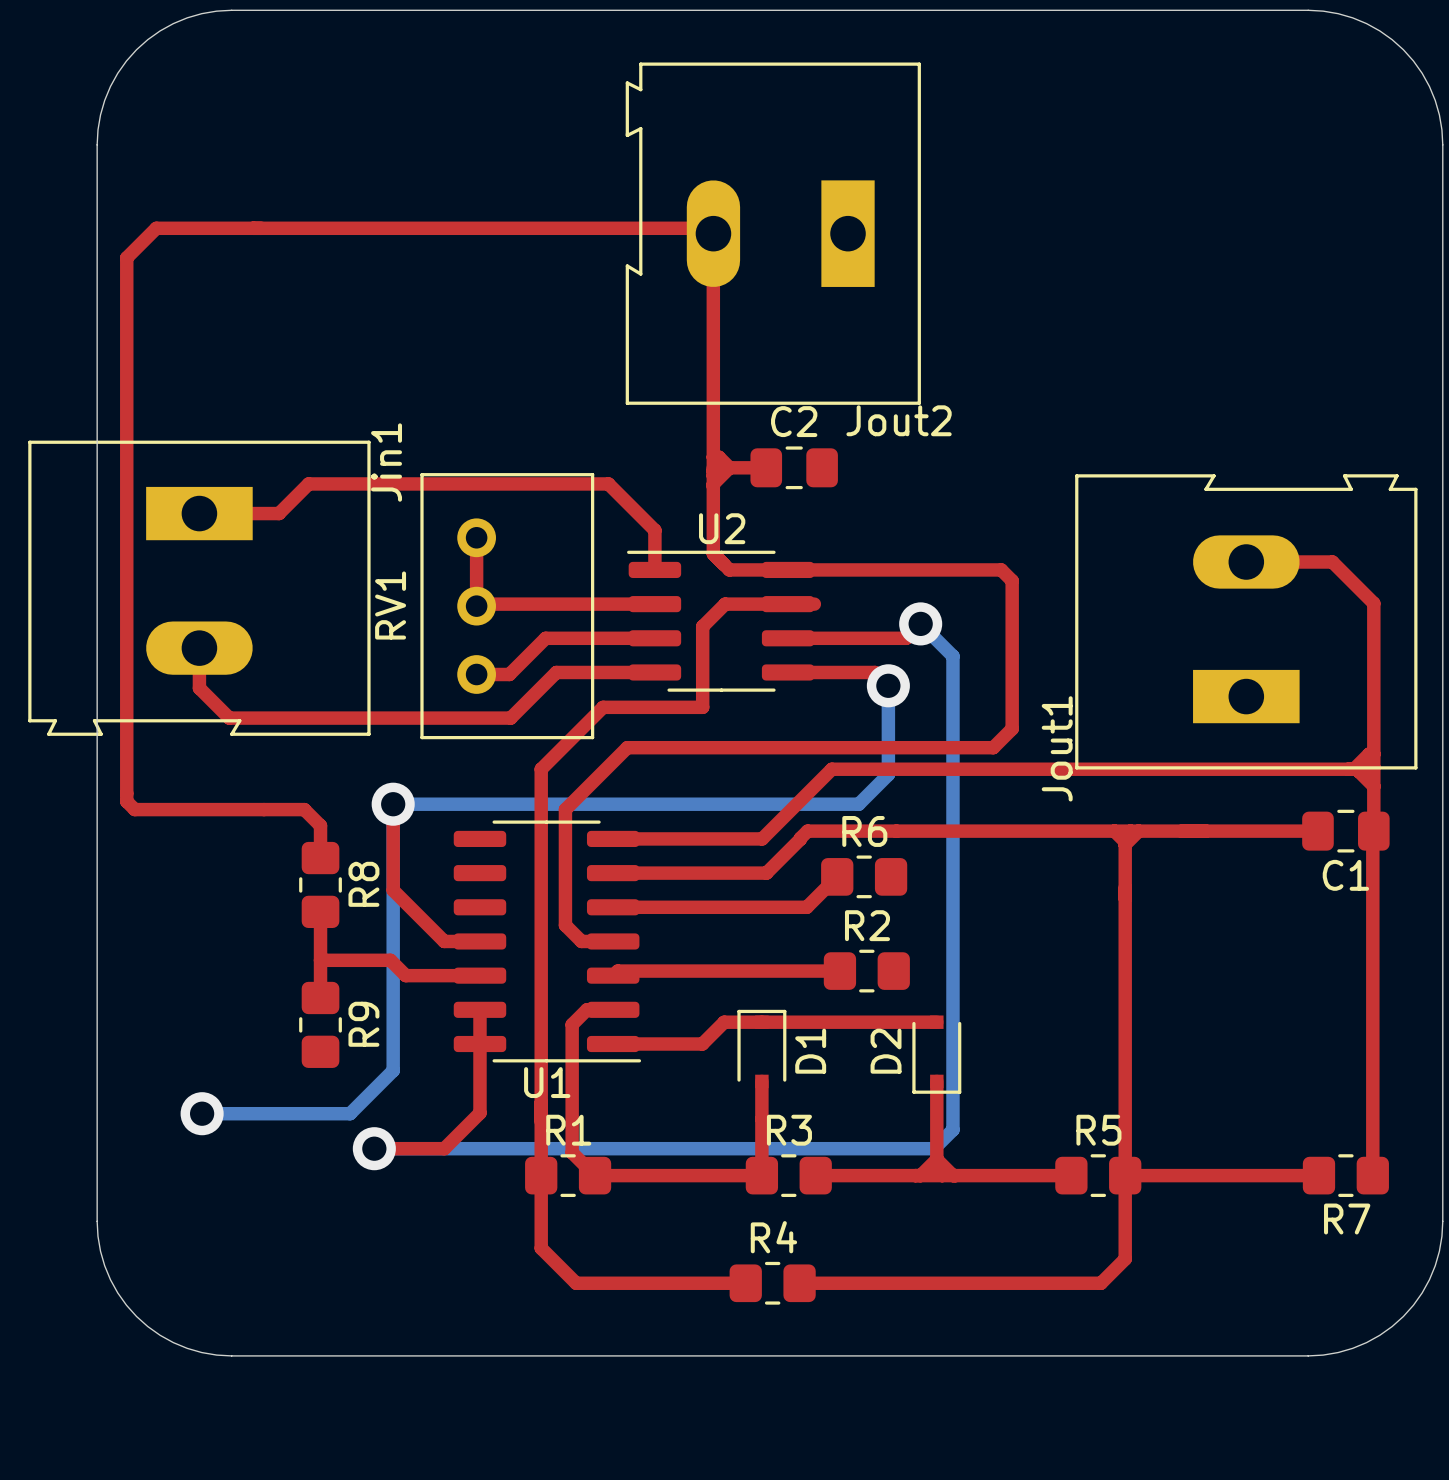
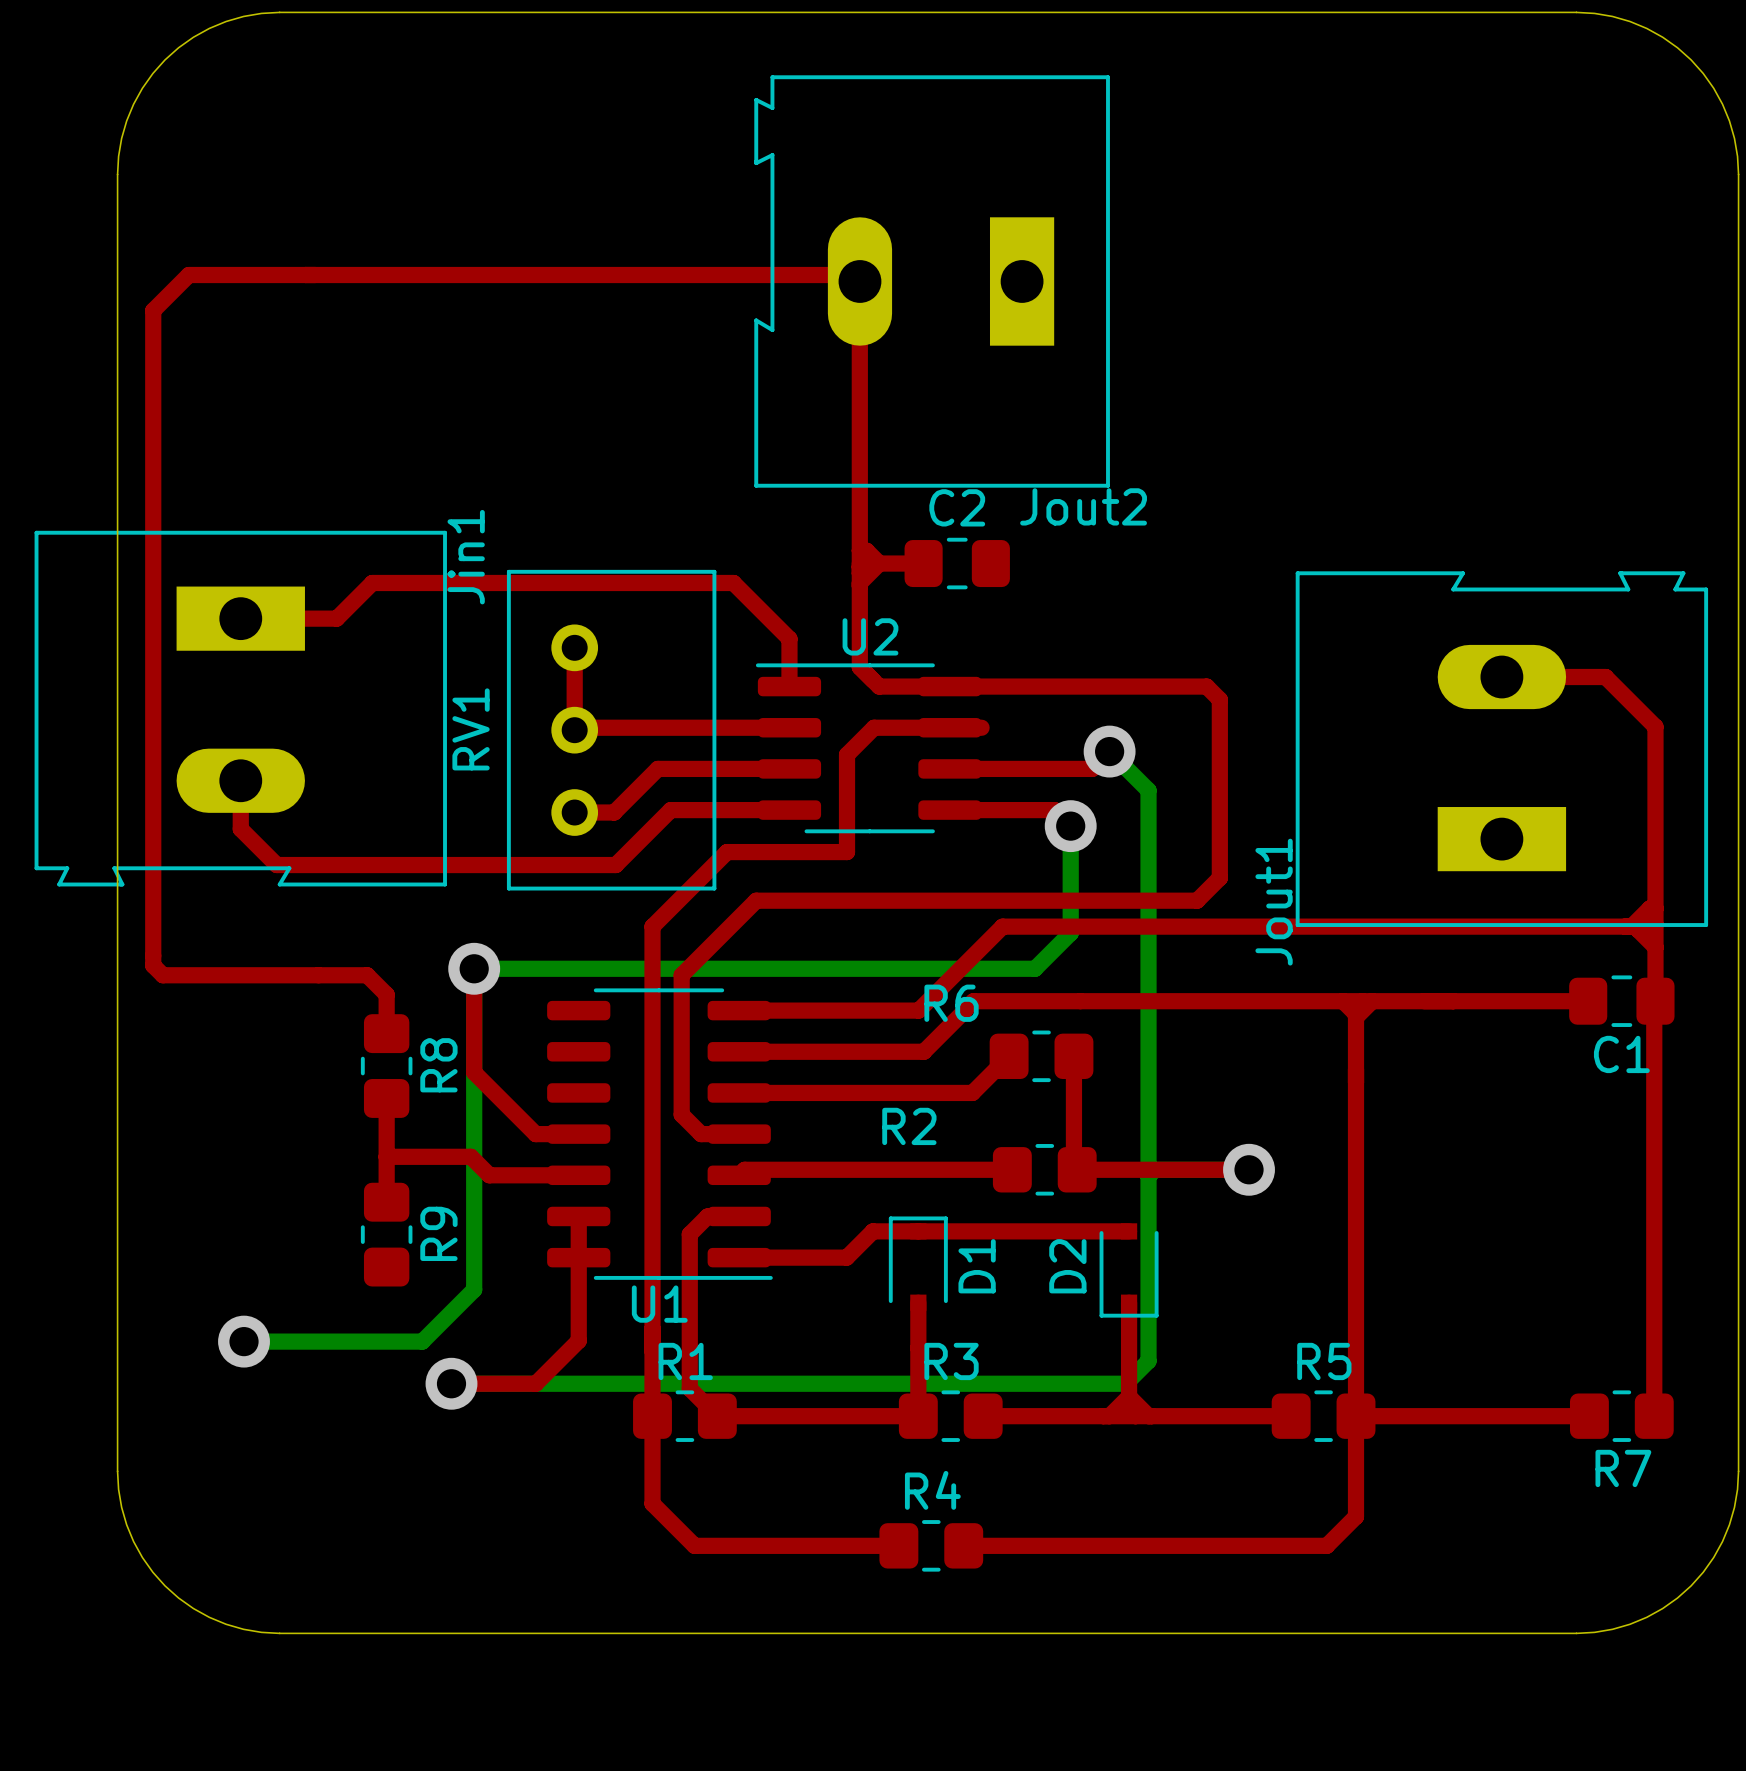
R6 name position: R6 (864, 831) -> R6 (951, 1003)
top track: none -> (1073, 1056) (1073, 1166) (1077, 1169) (1249, 1169)
R2 name position: R2 (867, 925) -> R2 (909, 1126)
via: none -> (1249, 1169)

